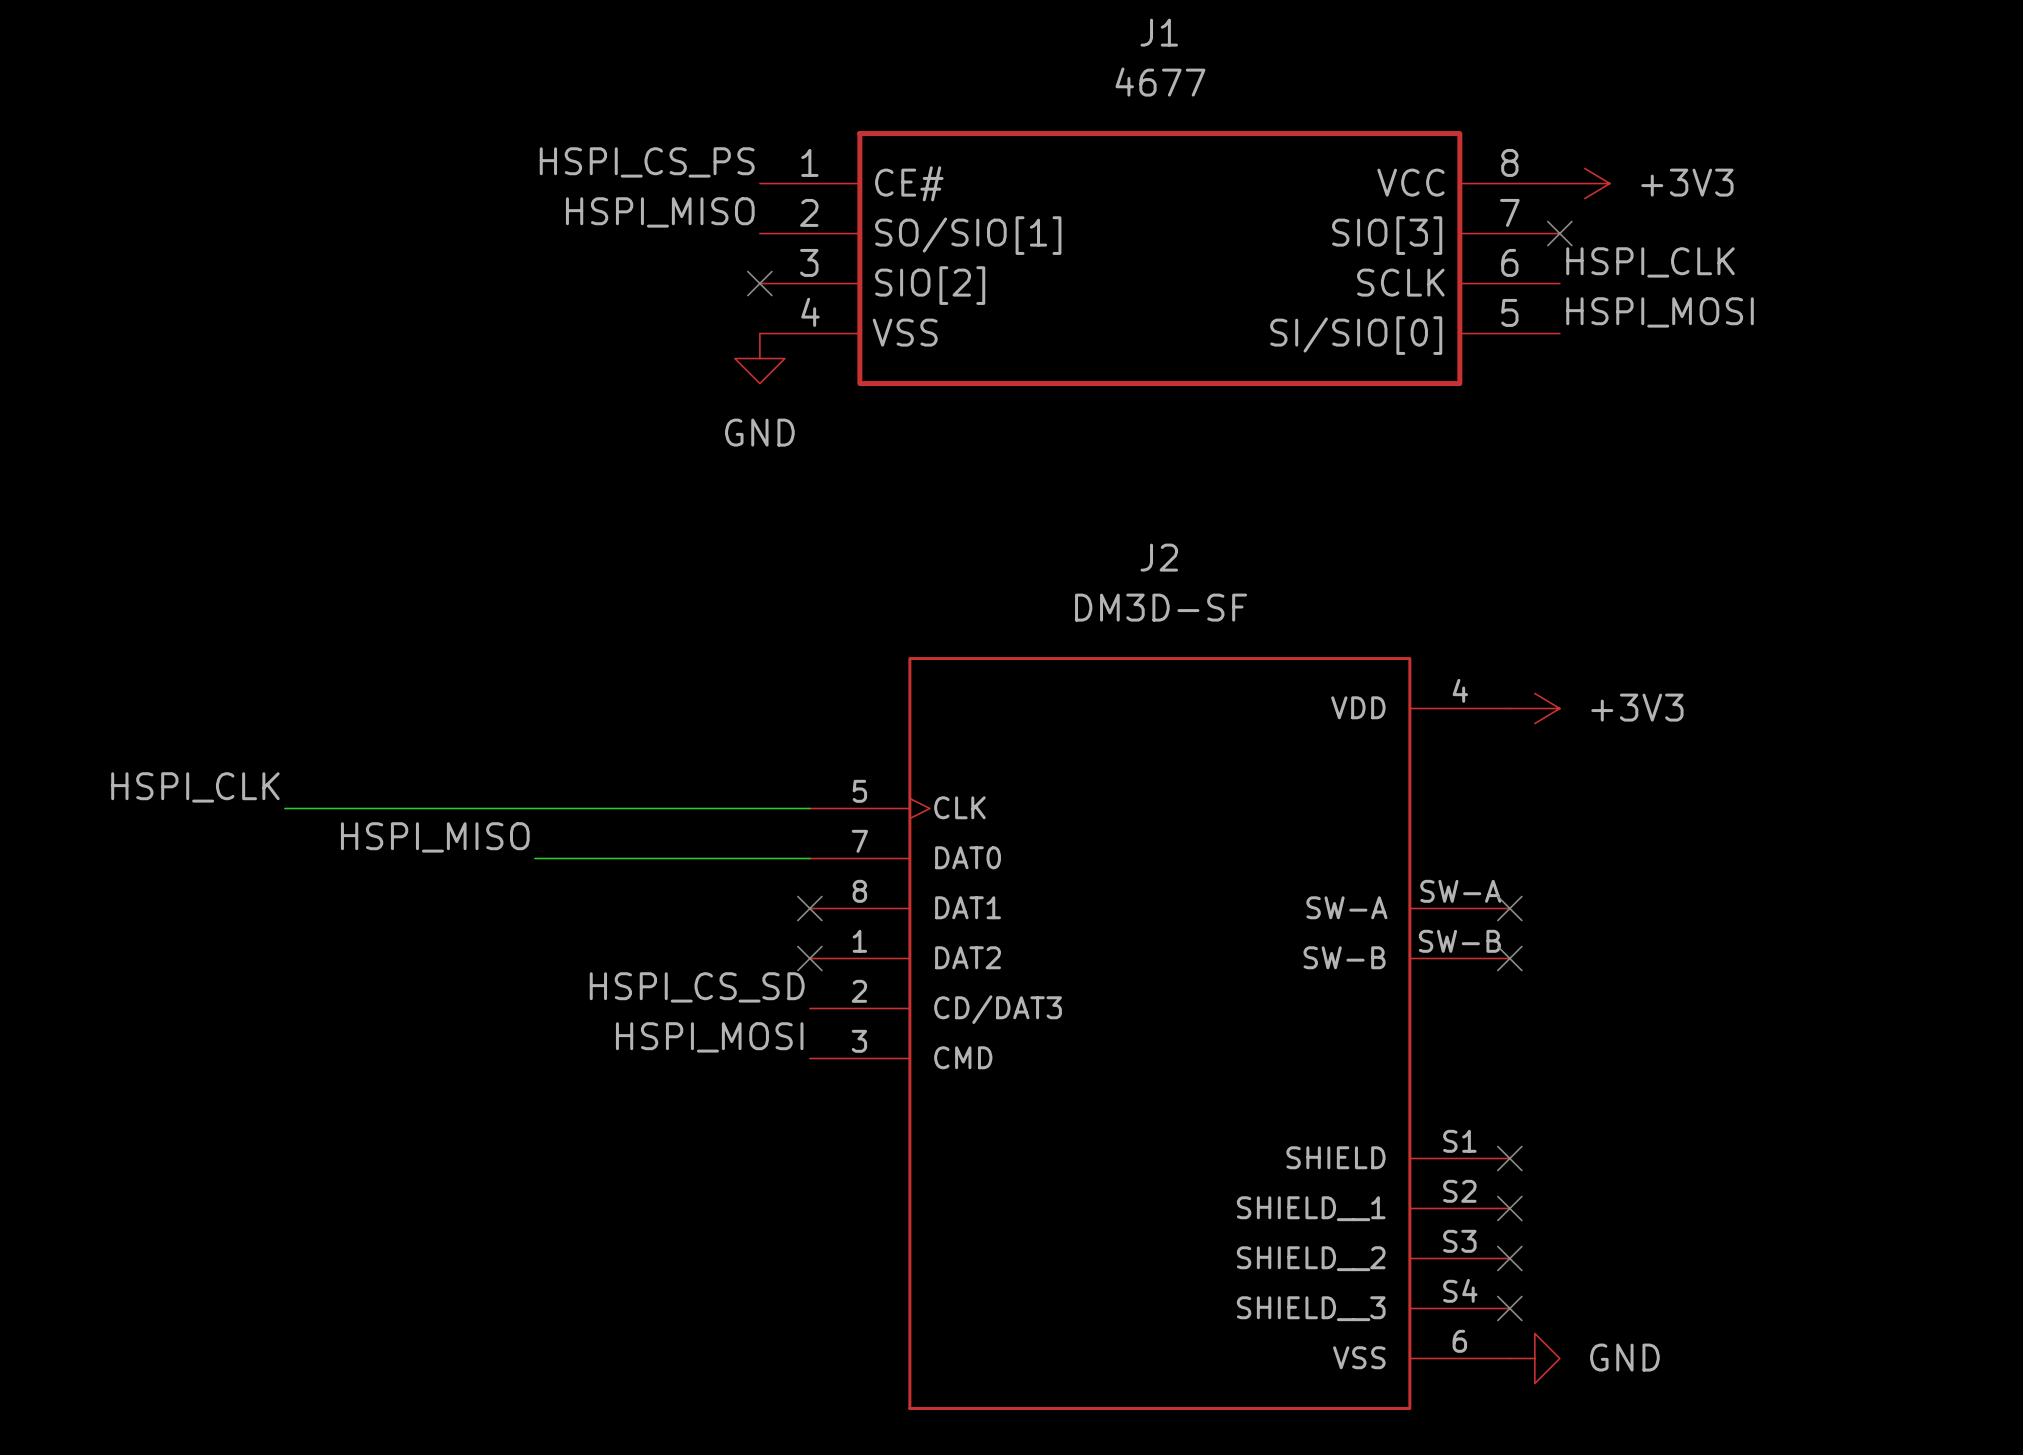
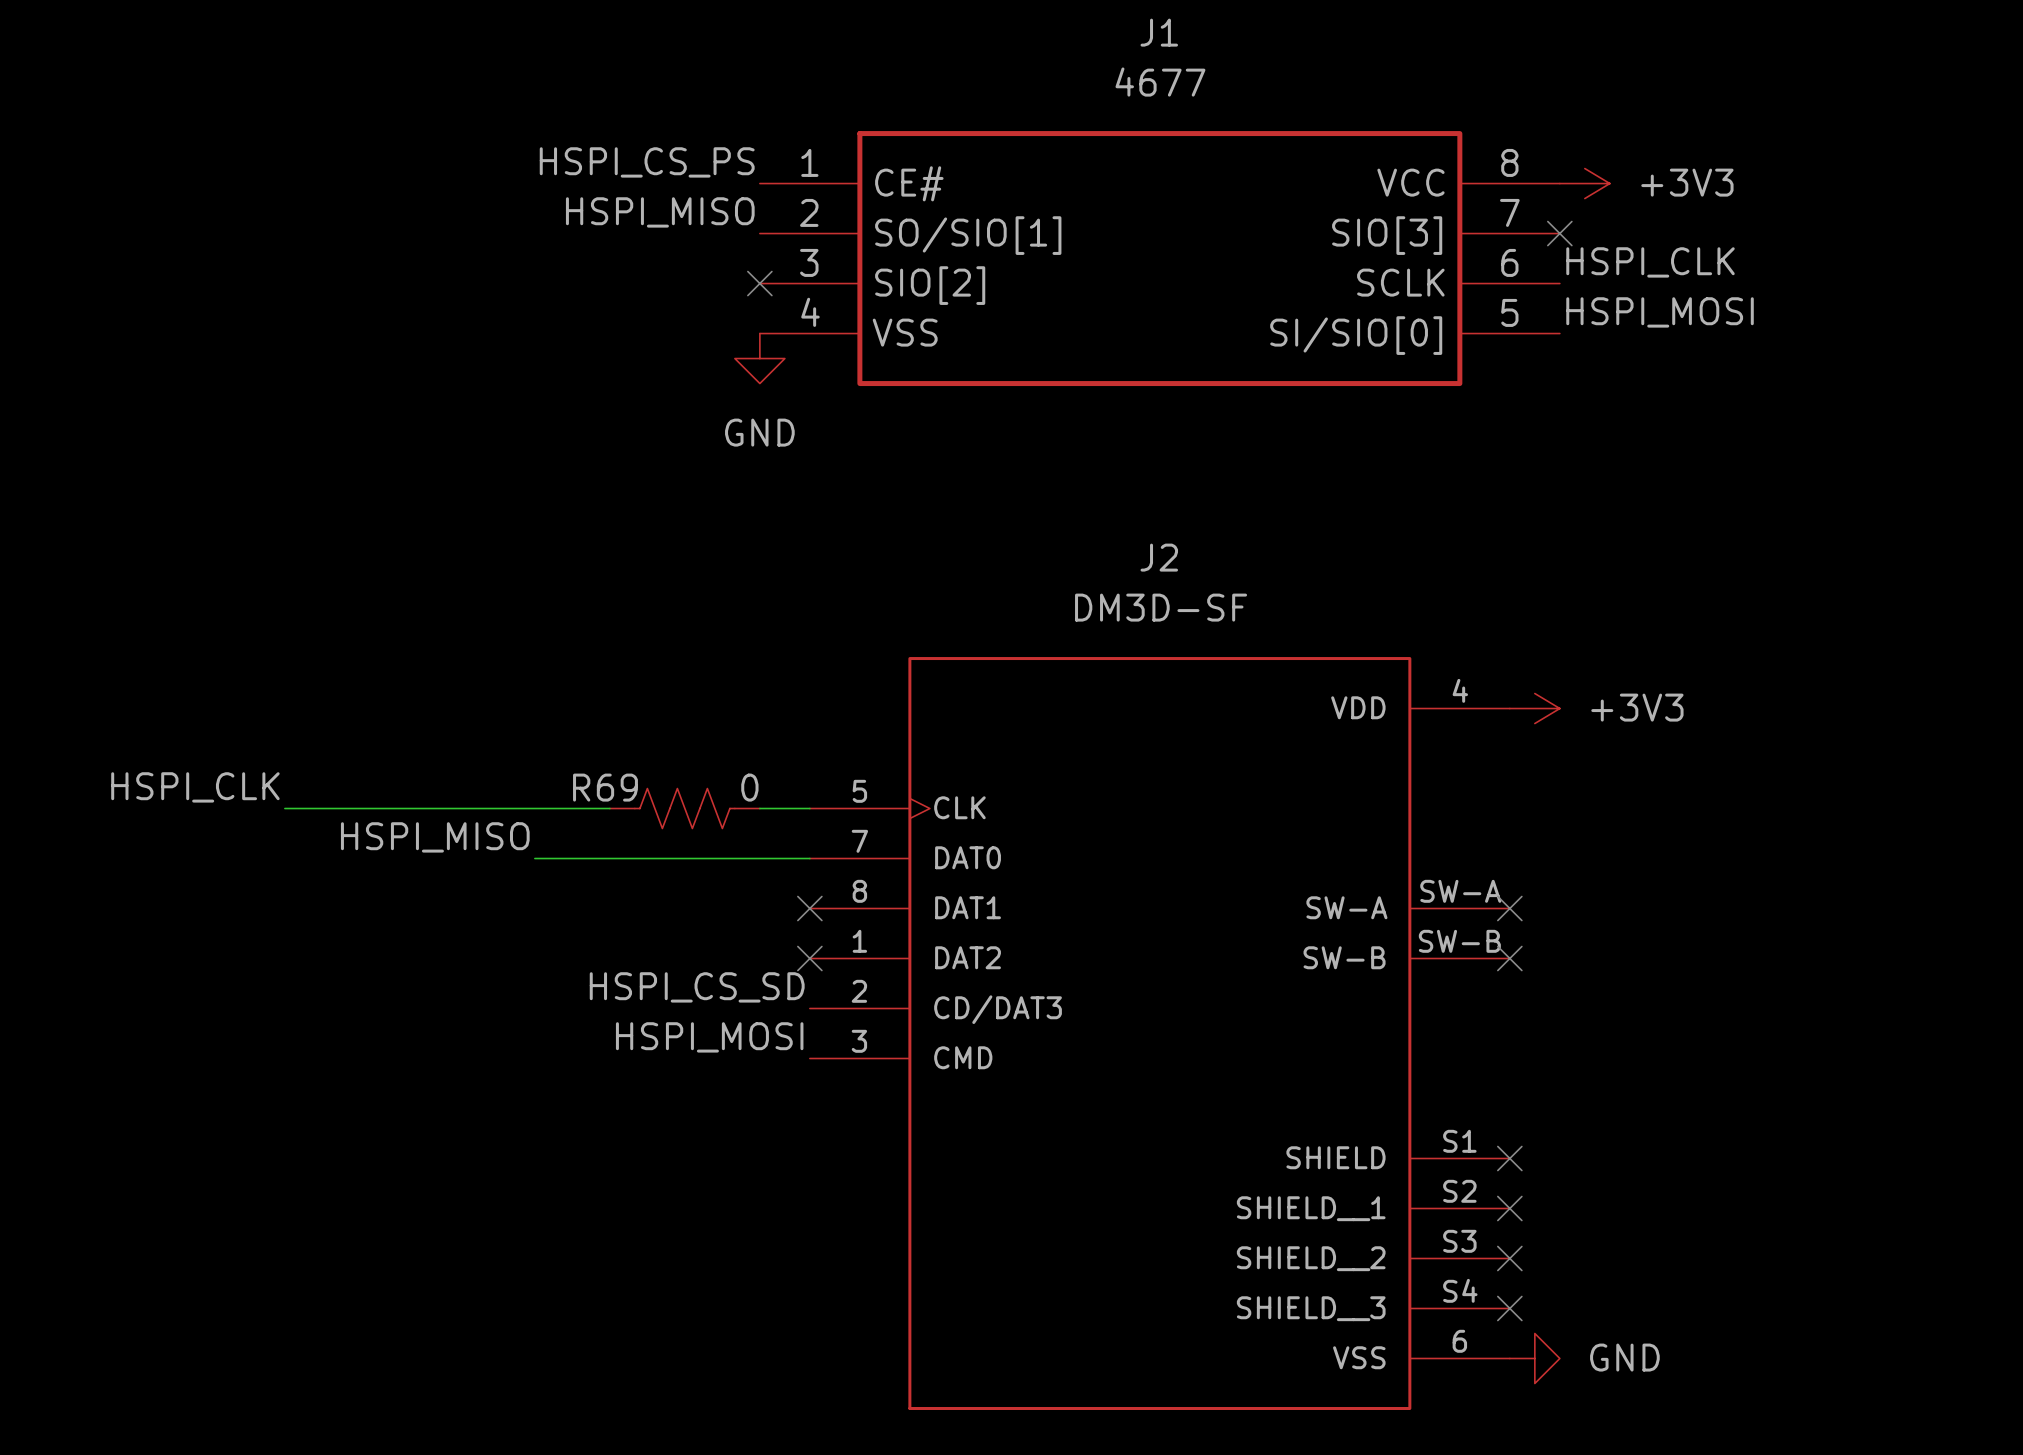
wire: (609, 808) (759, 808) -> none
R69: none -> 0 (684, 808)

